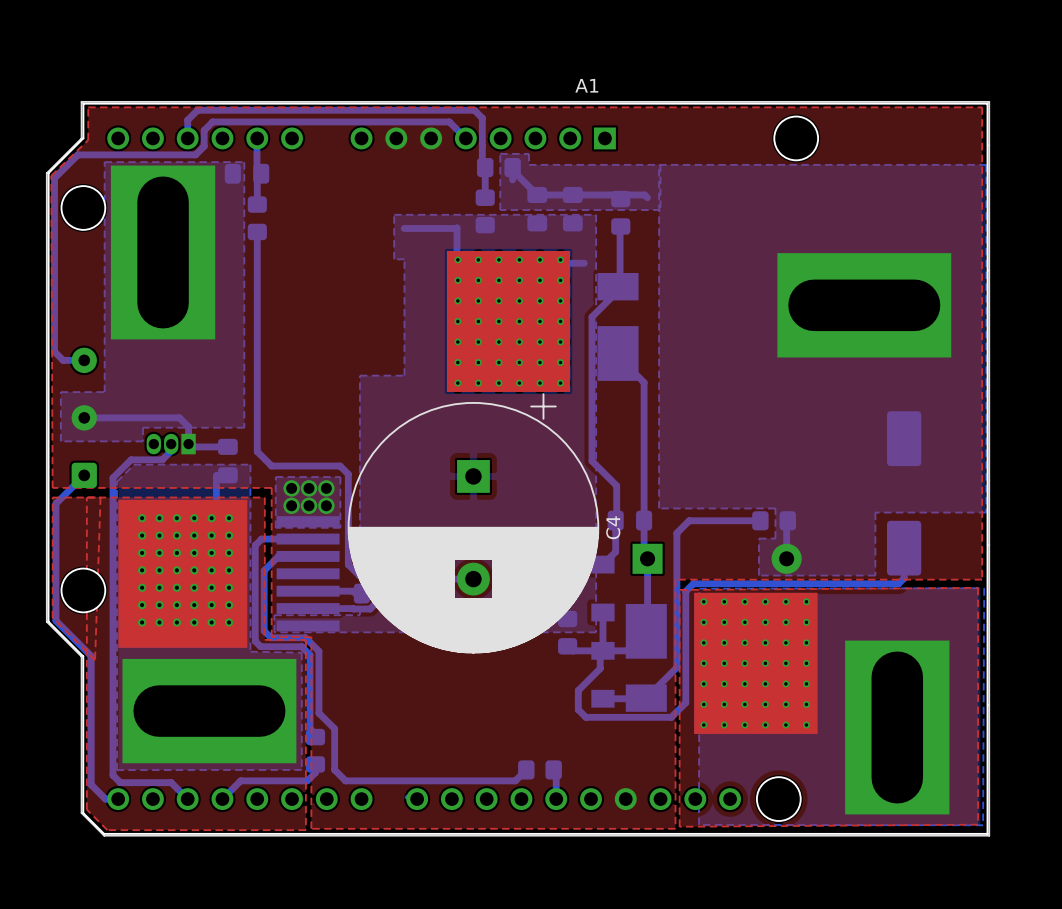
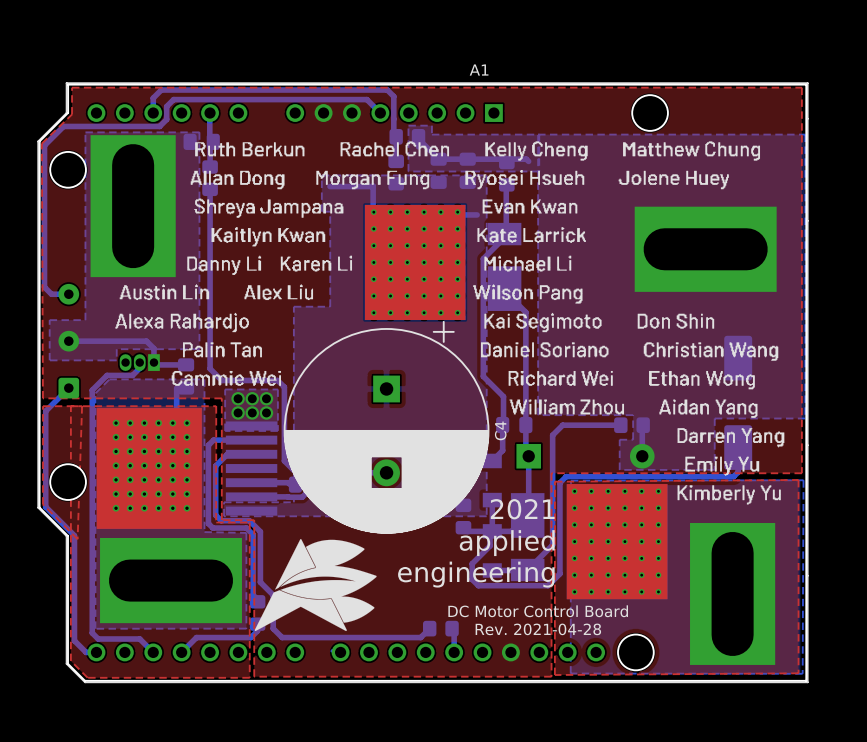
drawing: none -> [115, 141, 785, 505]
text: none -> 2021 (522, 509)
drawing: none -> [254, 539, 377, 632]
text: none -> applied (507, 543)
text: none -> engineering (476, 574)
text: none -> DC Motor Control Board (538, 611)
text: none -> Rev. 2021-04-28 (538, 629)

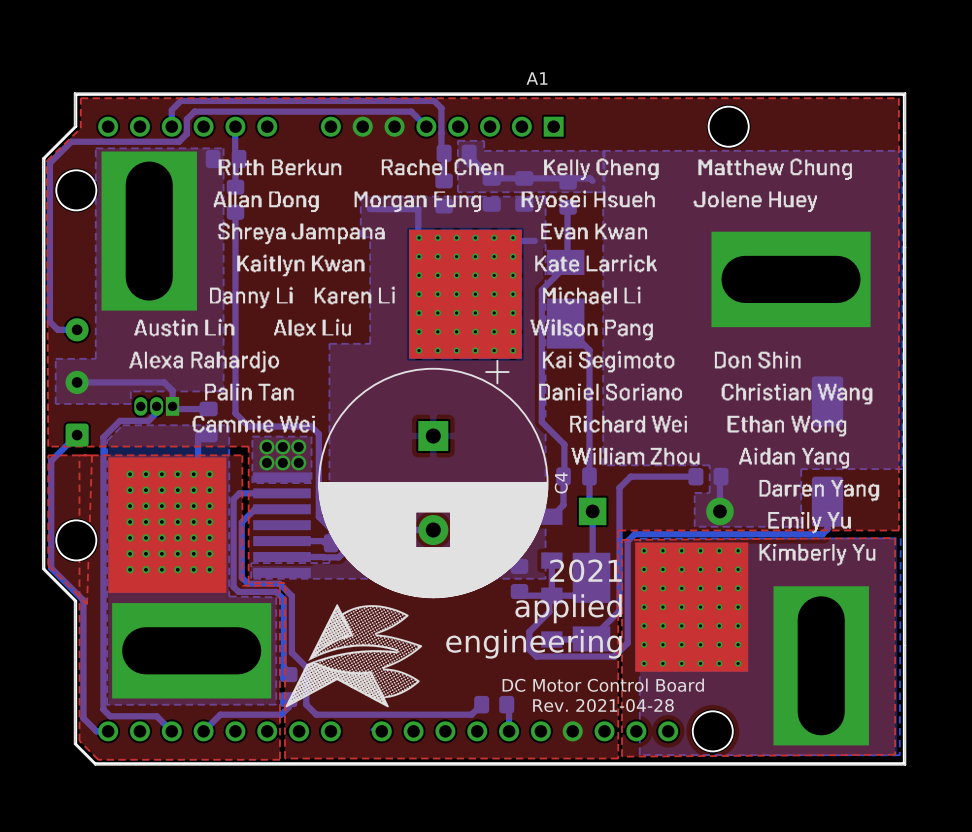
drawing shape: [254, 539, 377, 632] -> [285, 604, 423, 708]

